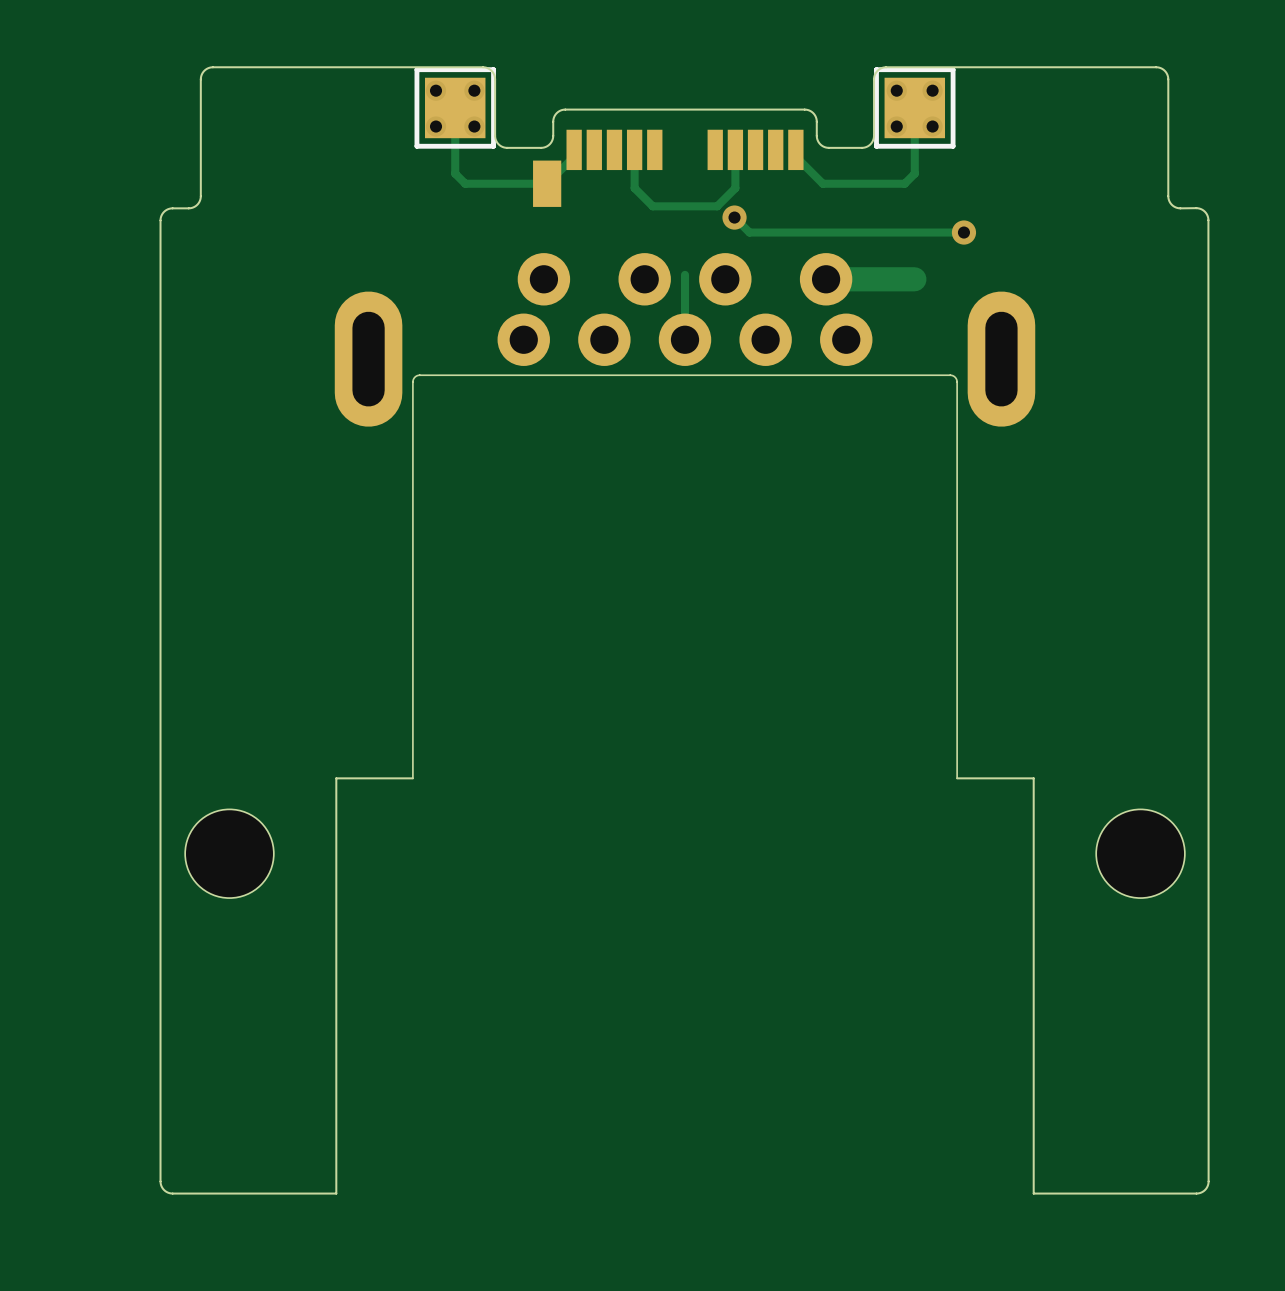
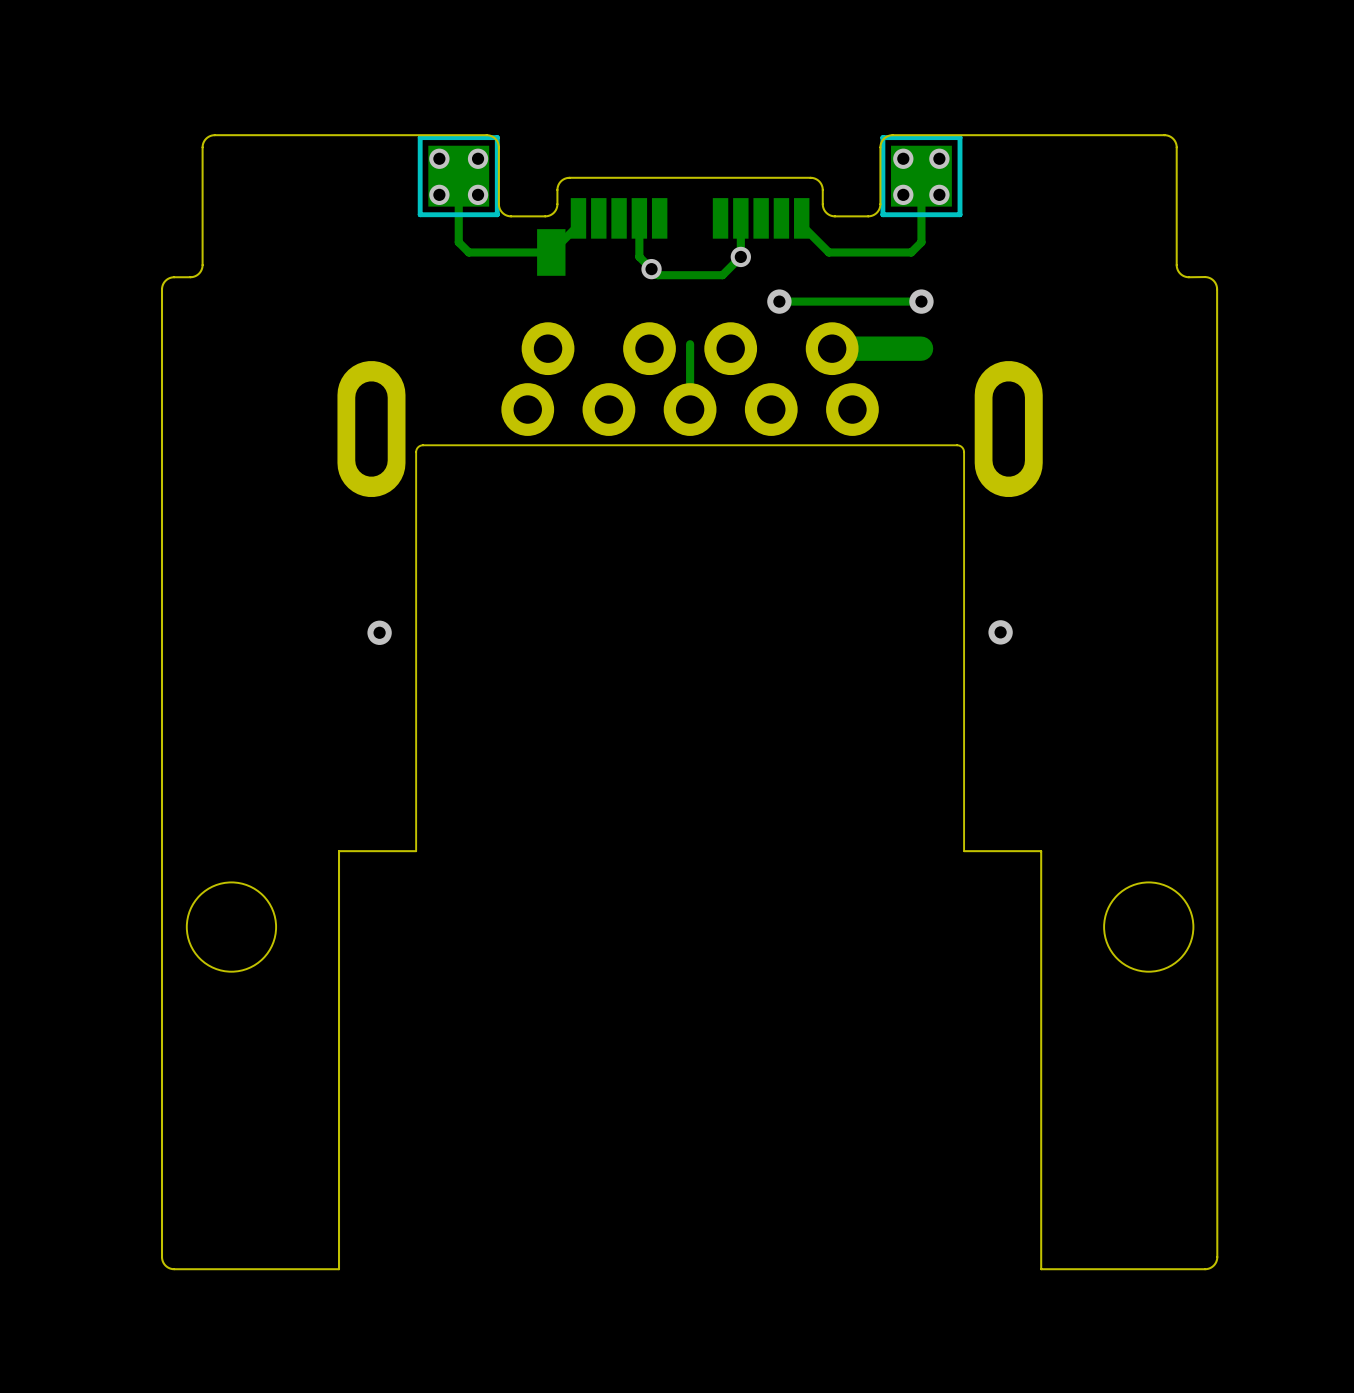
via: none -> (740, 256)
via: none -> (651, 269)
track: (734, 217) (749, 232) (773, 232) -> none
via position: (734, 217) -> (779, 301)
track: (963, 232) (914, 232) -> none
via position: (963, 232) -> (921, 301)
via: none -> (379, 632)
via: none -> (1000, 632)

